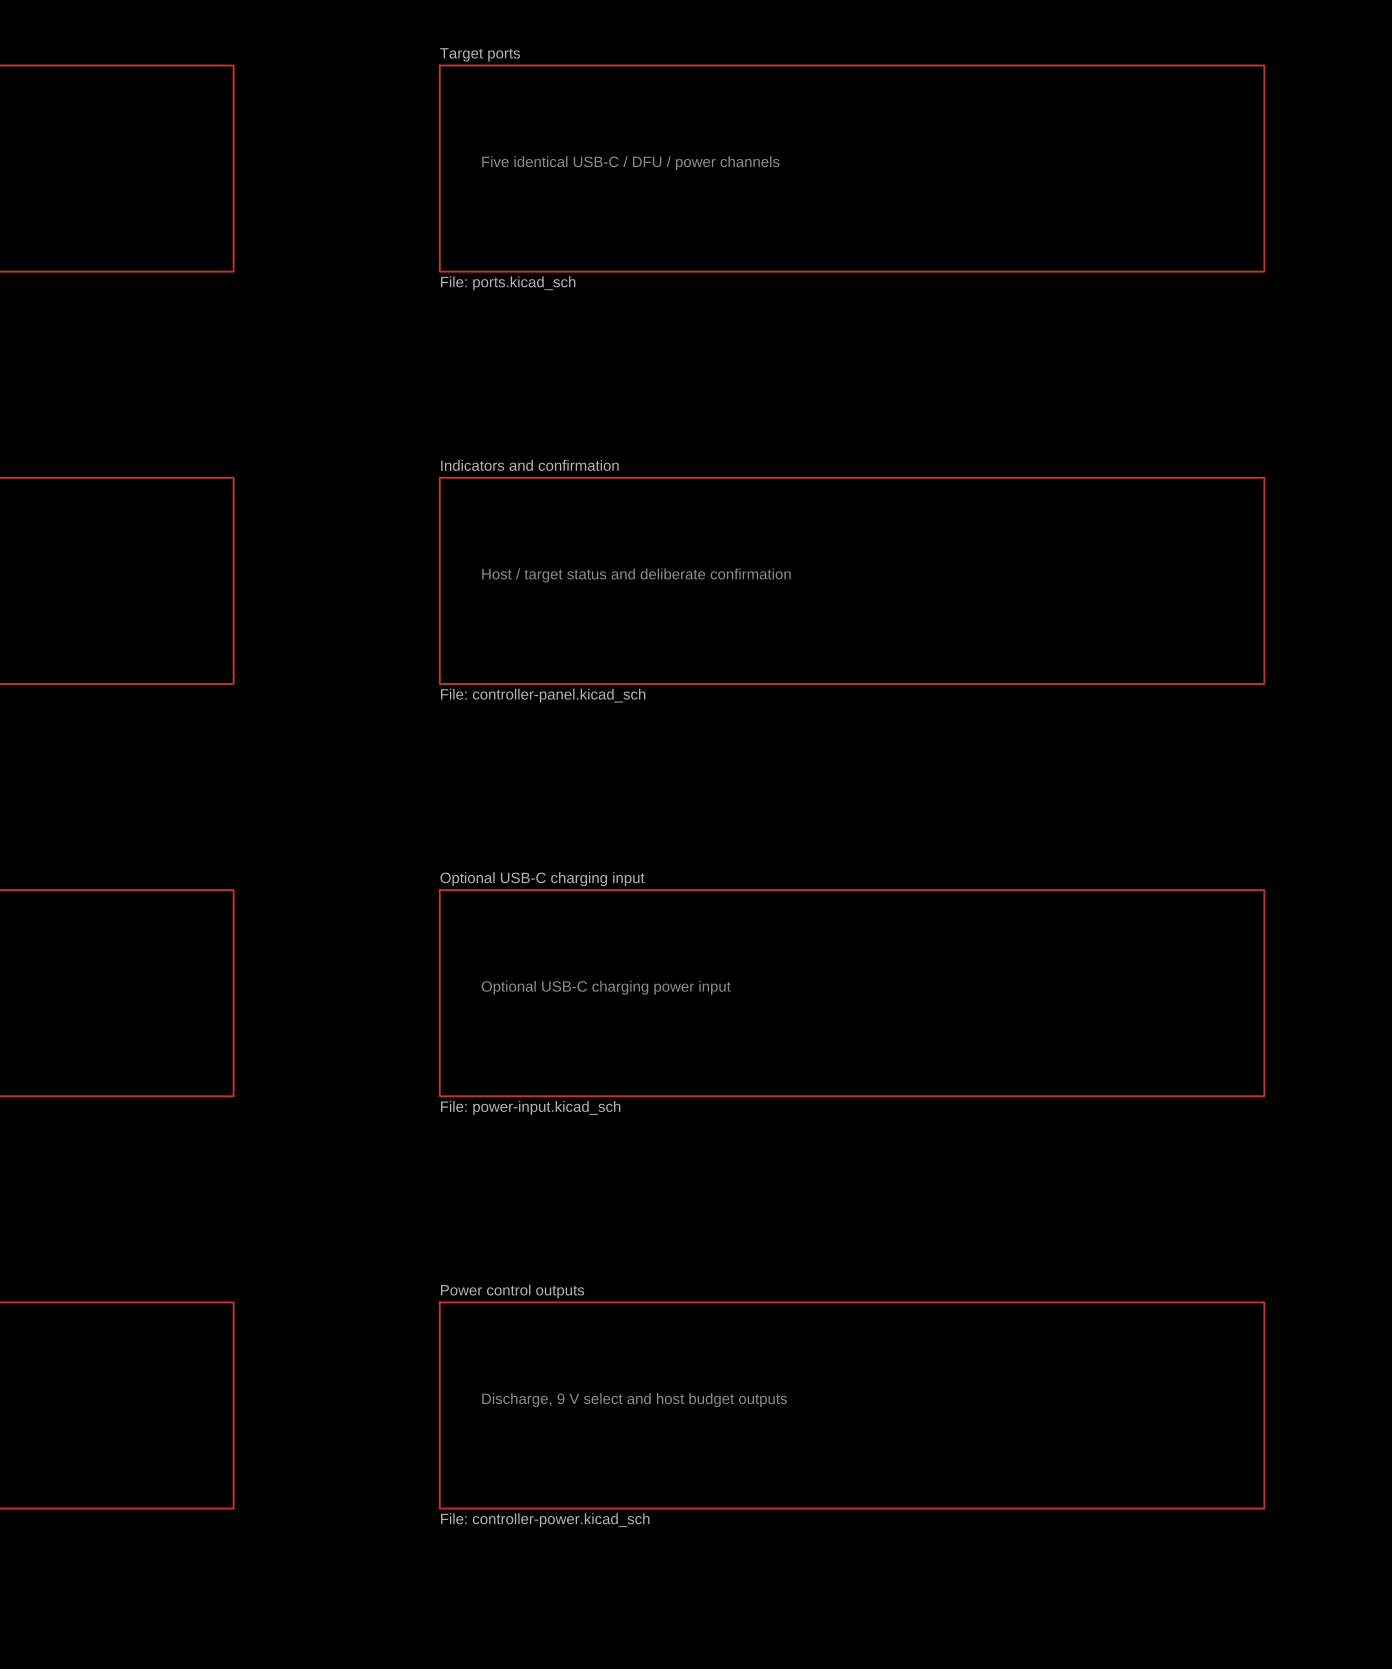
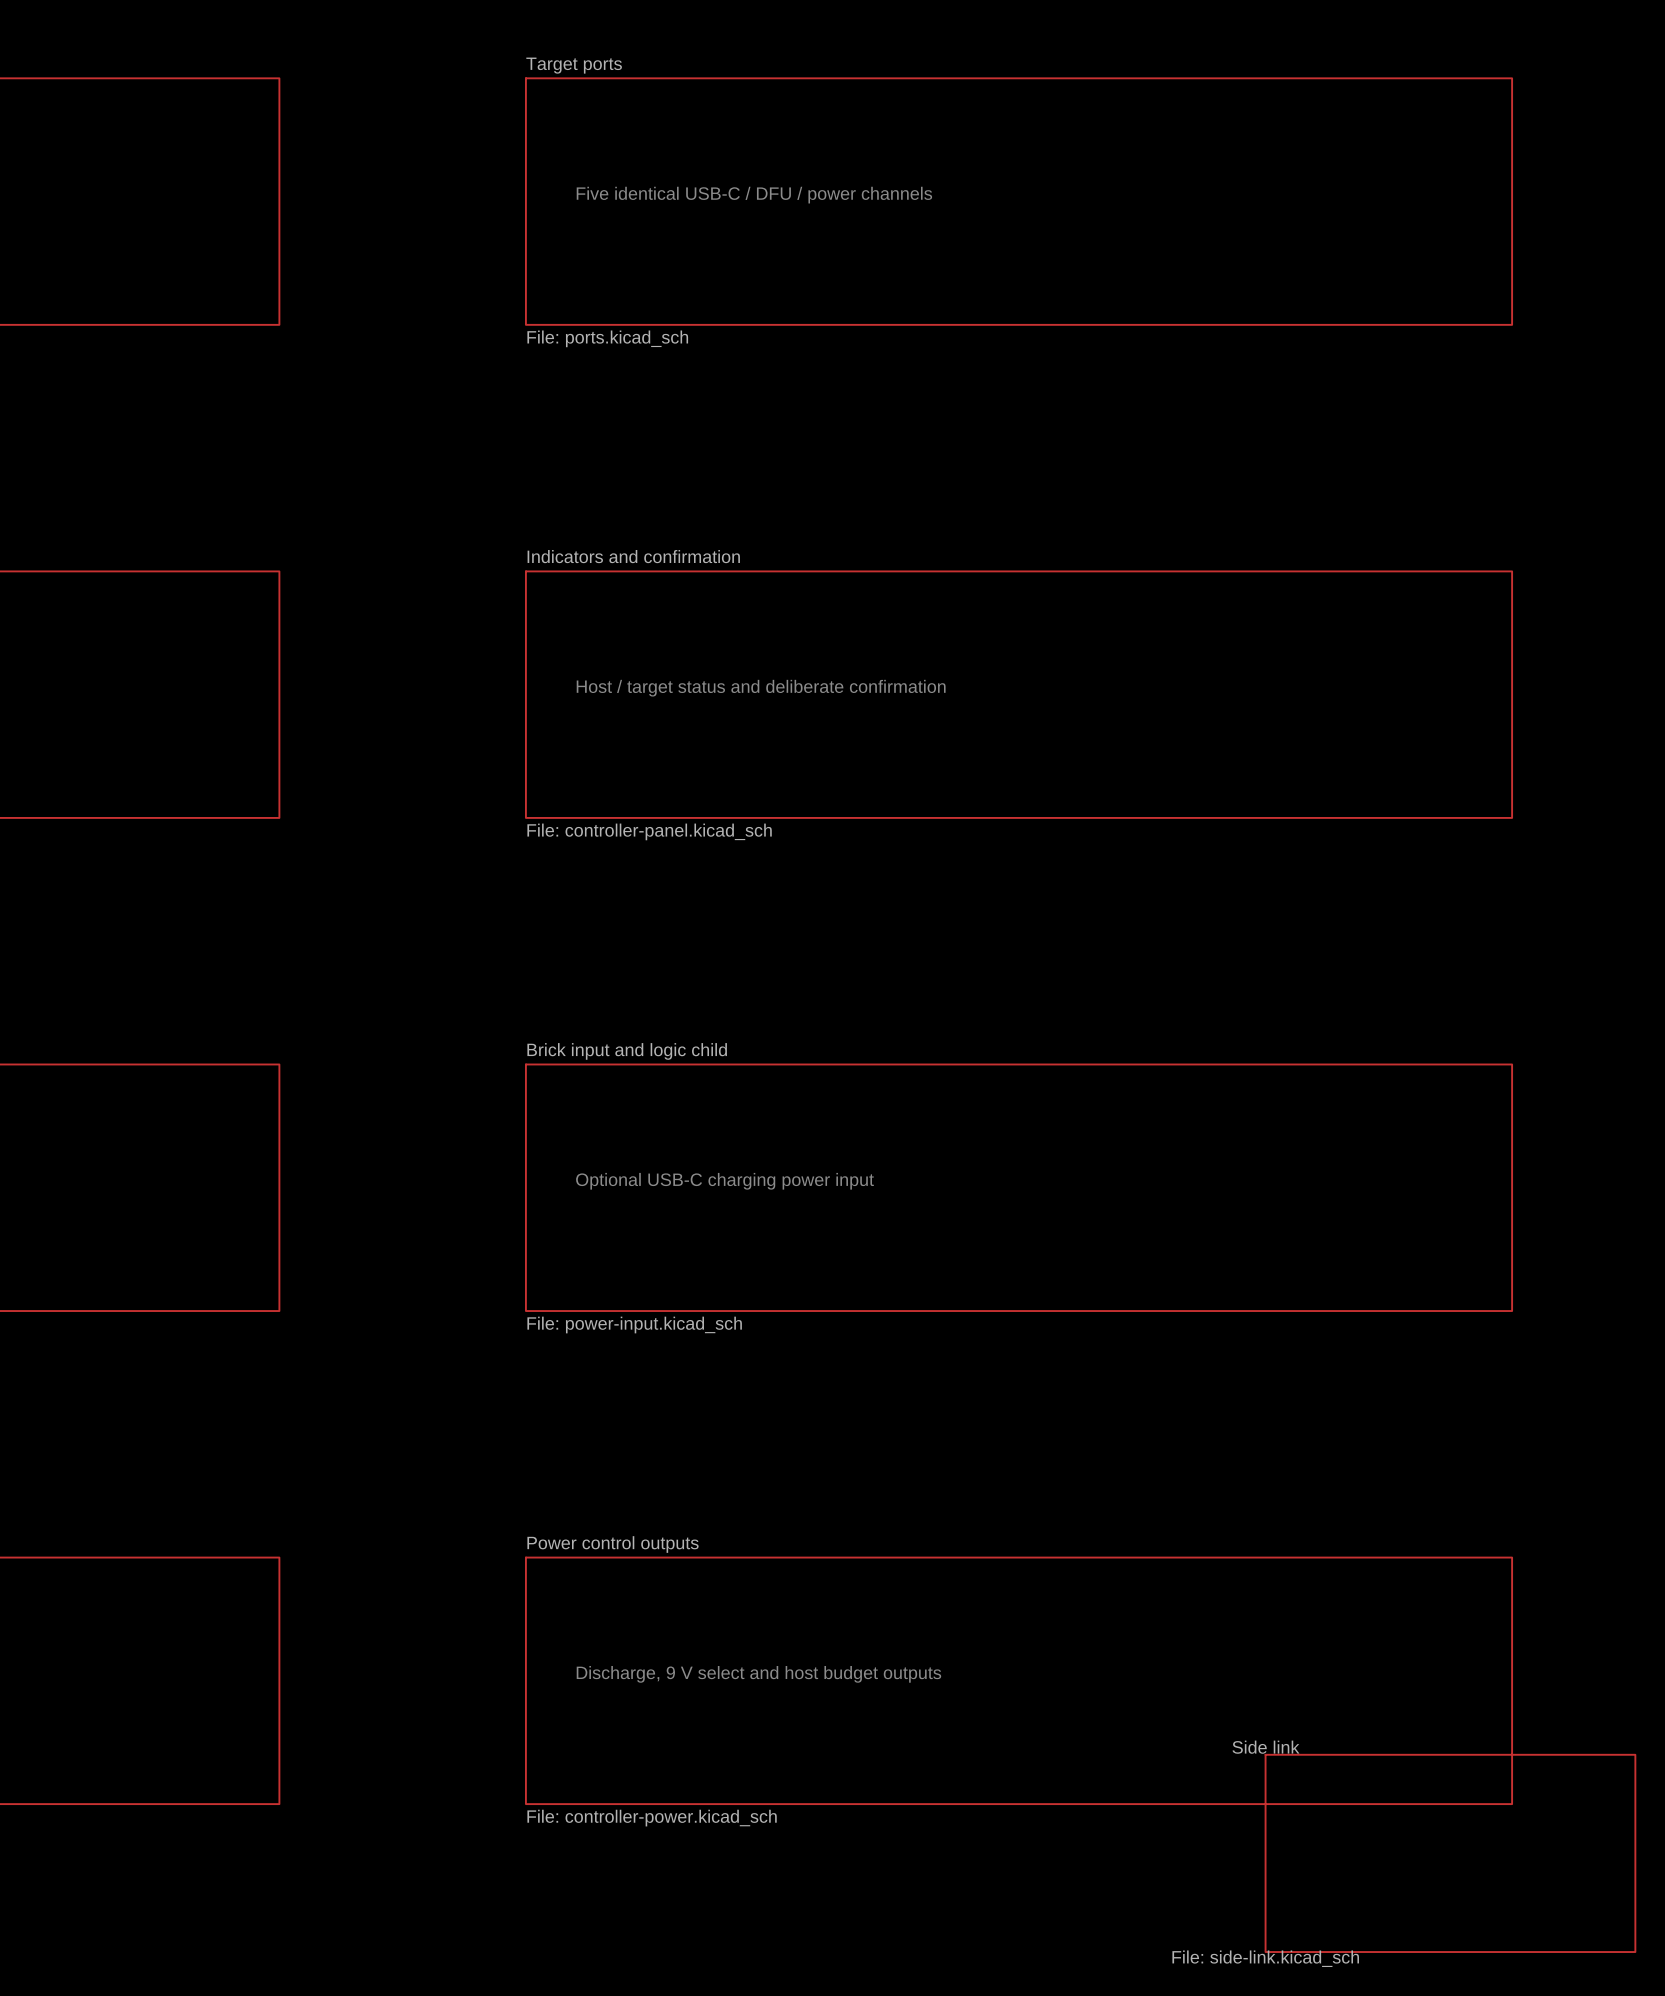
sheet Optional USB-C charging input name: Optional USB-C charging input (542, 879) -> Brick input and logic child (627, 1051)
sheet Side link: none -> File: side-link.kicad_sch (1450, 1853)

